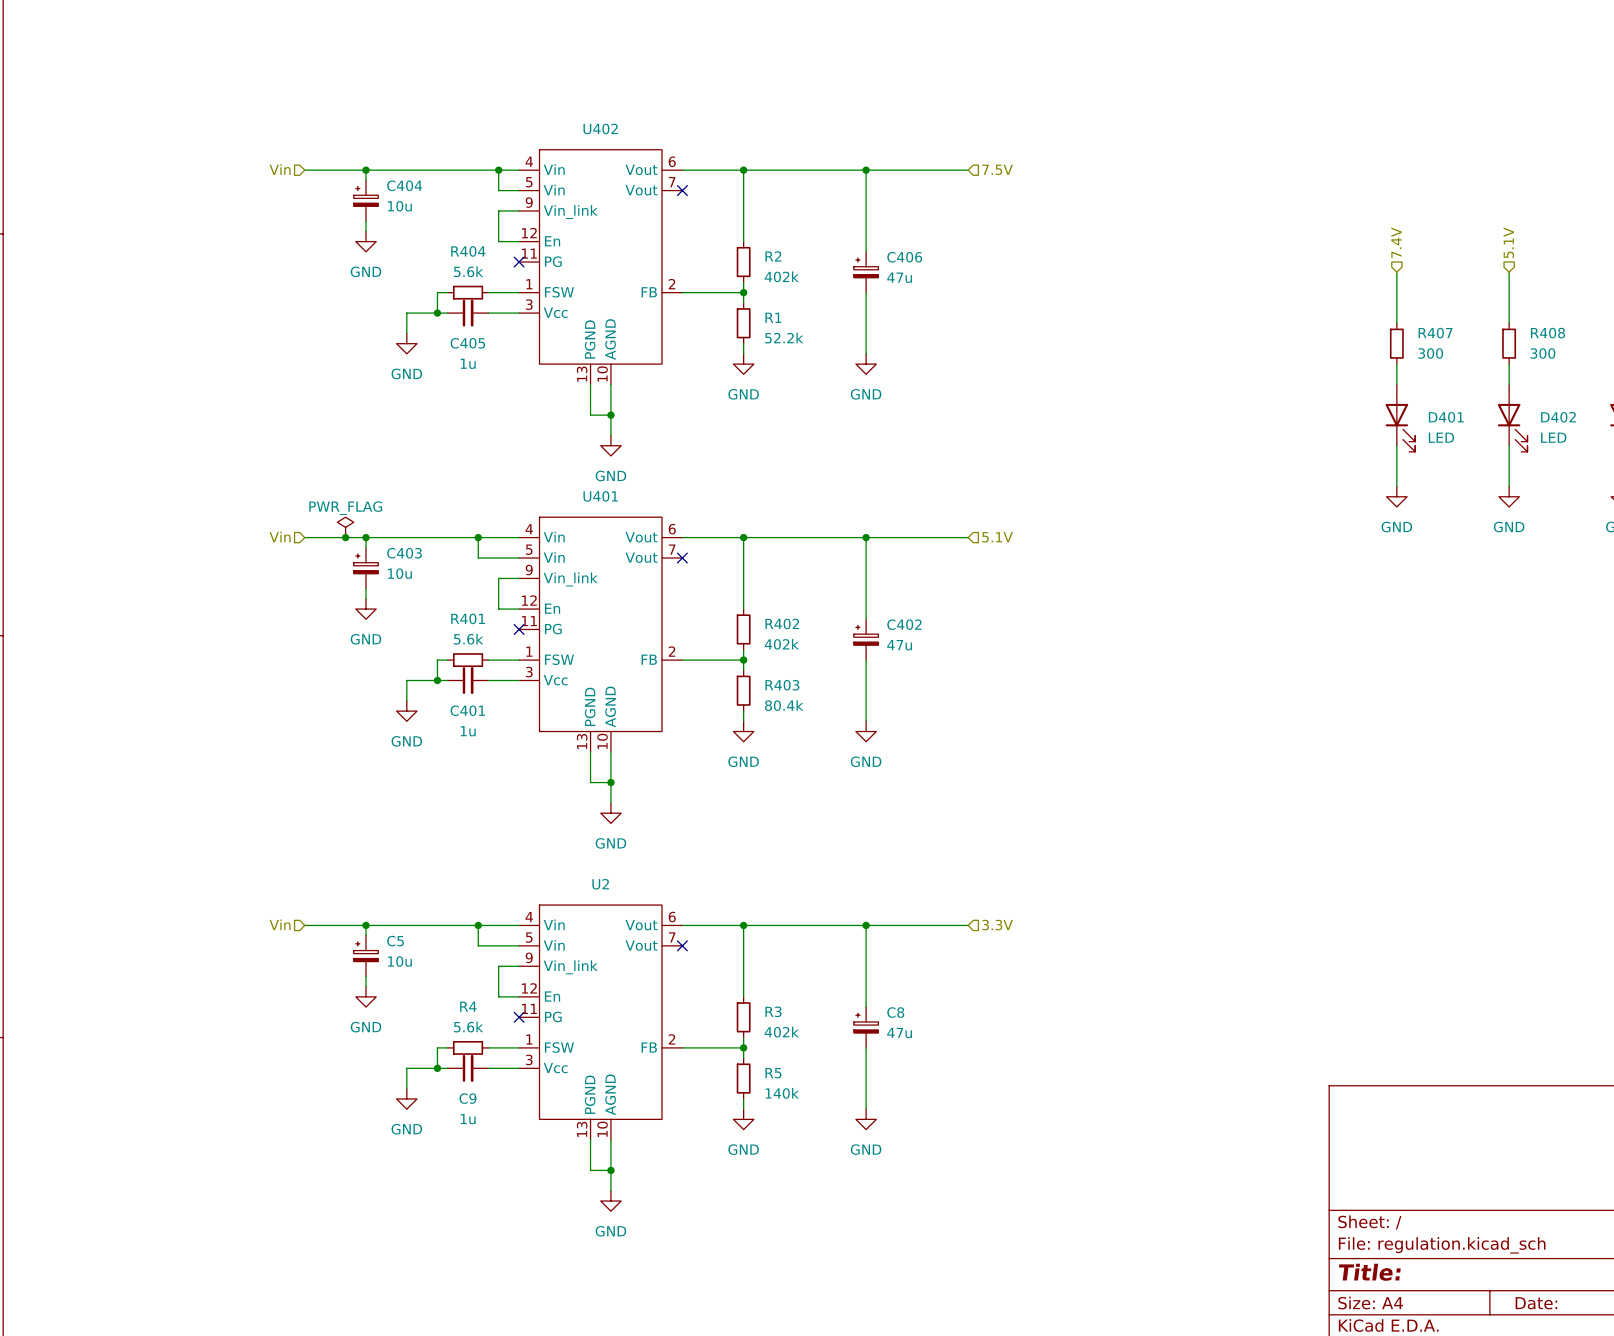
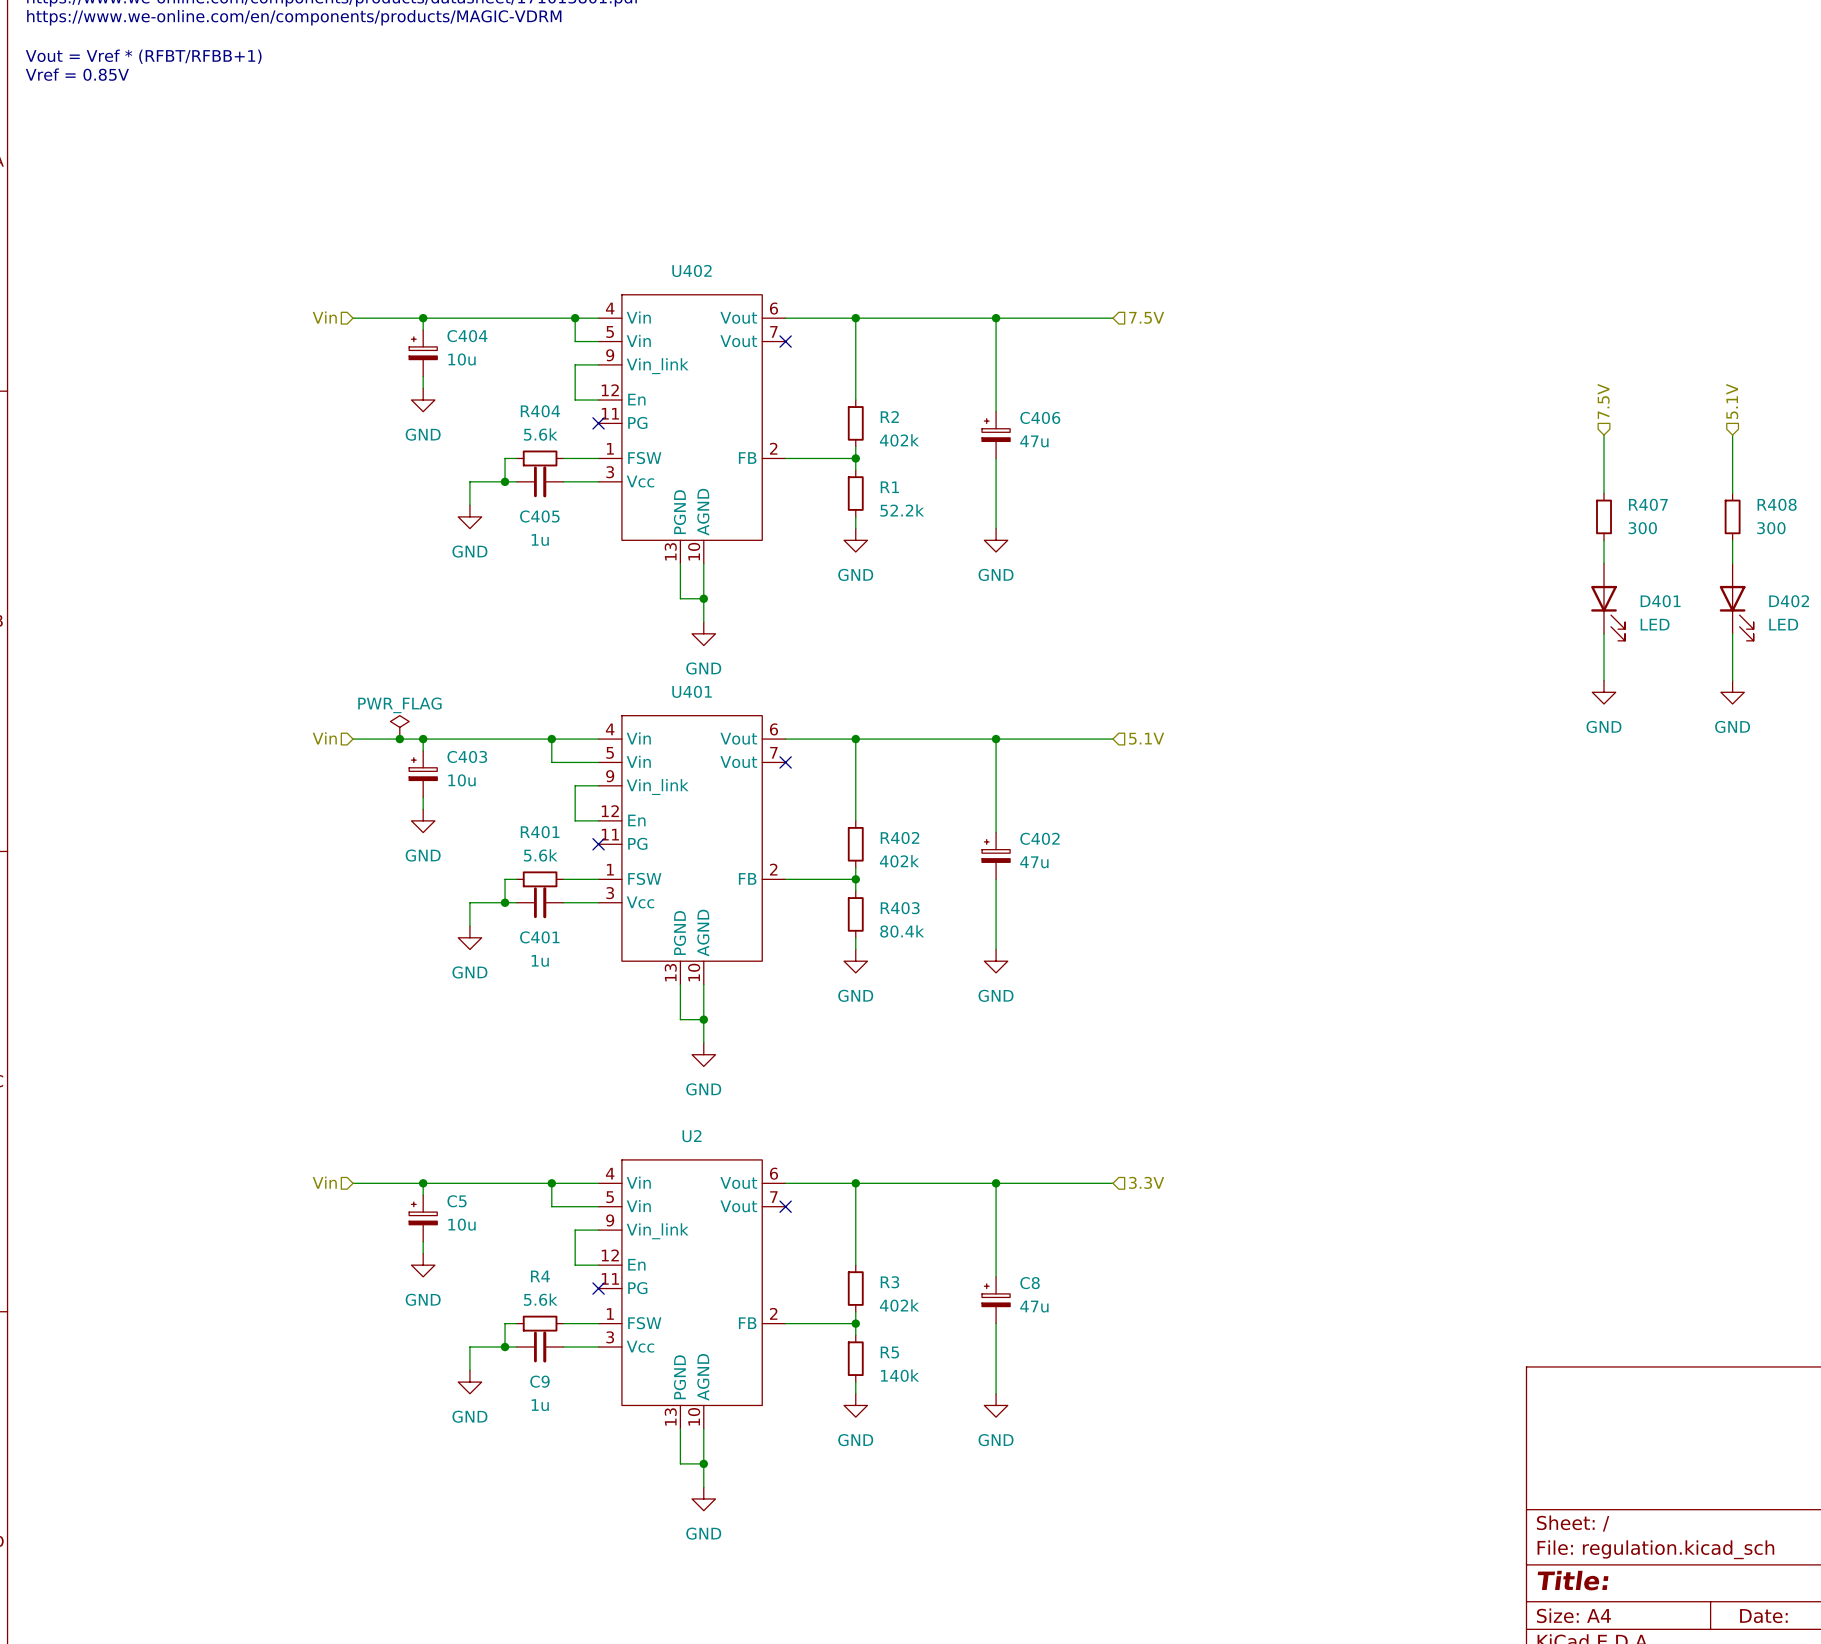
hierarchical label: 7.4V (1396, 242) -> 7.5V (1603, 401)

